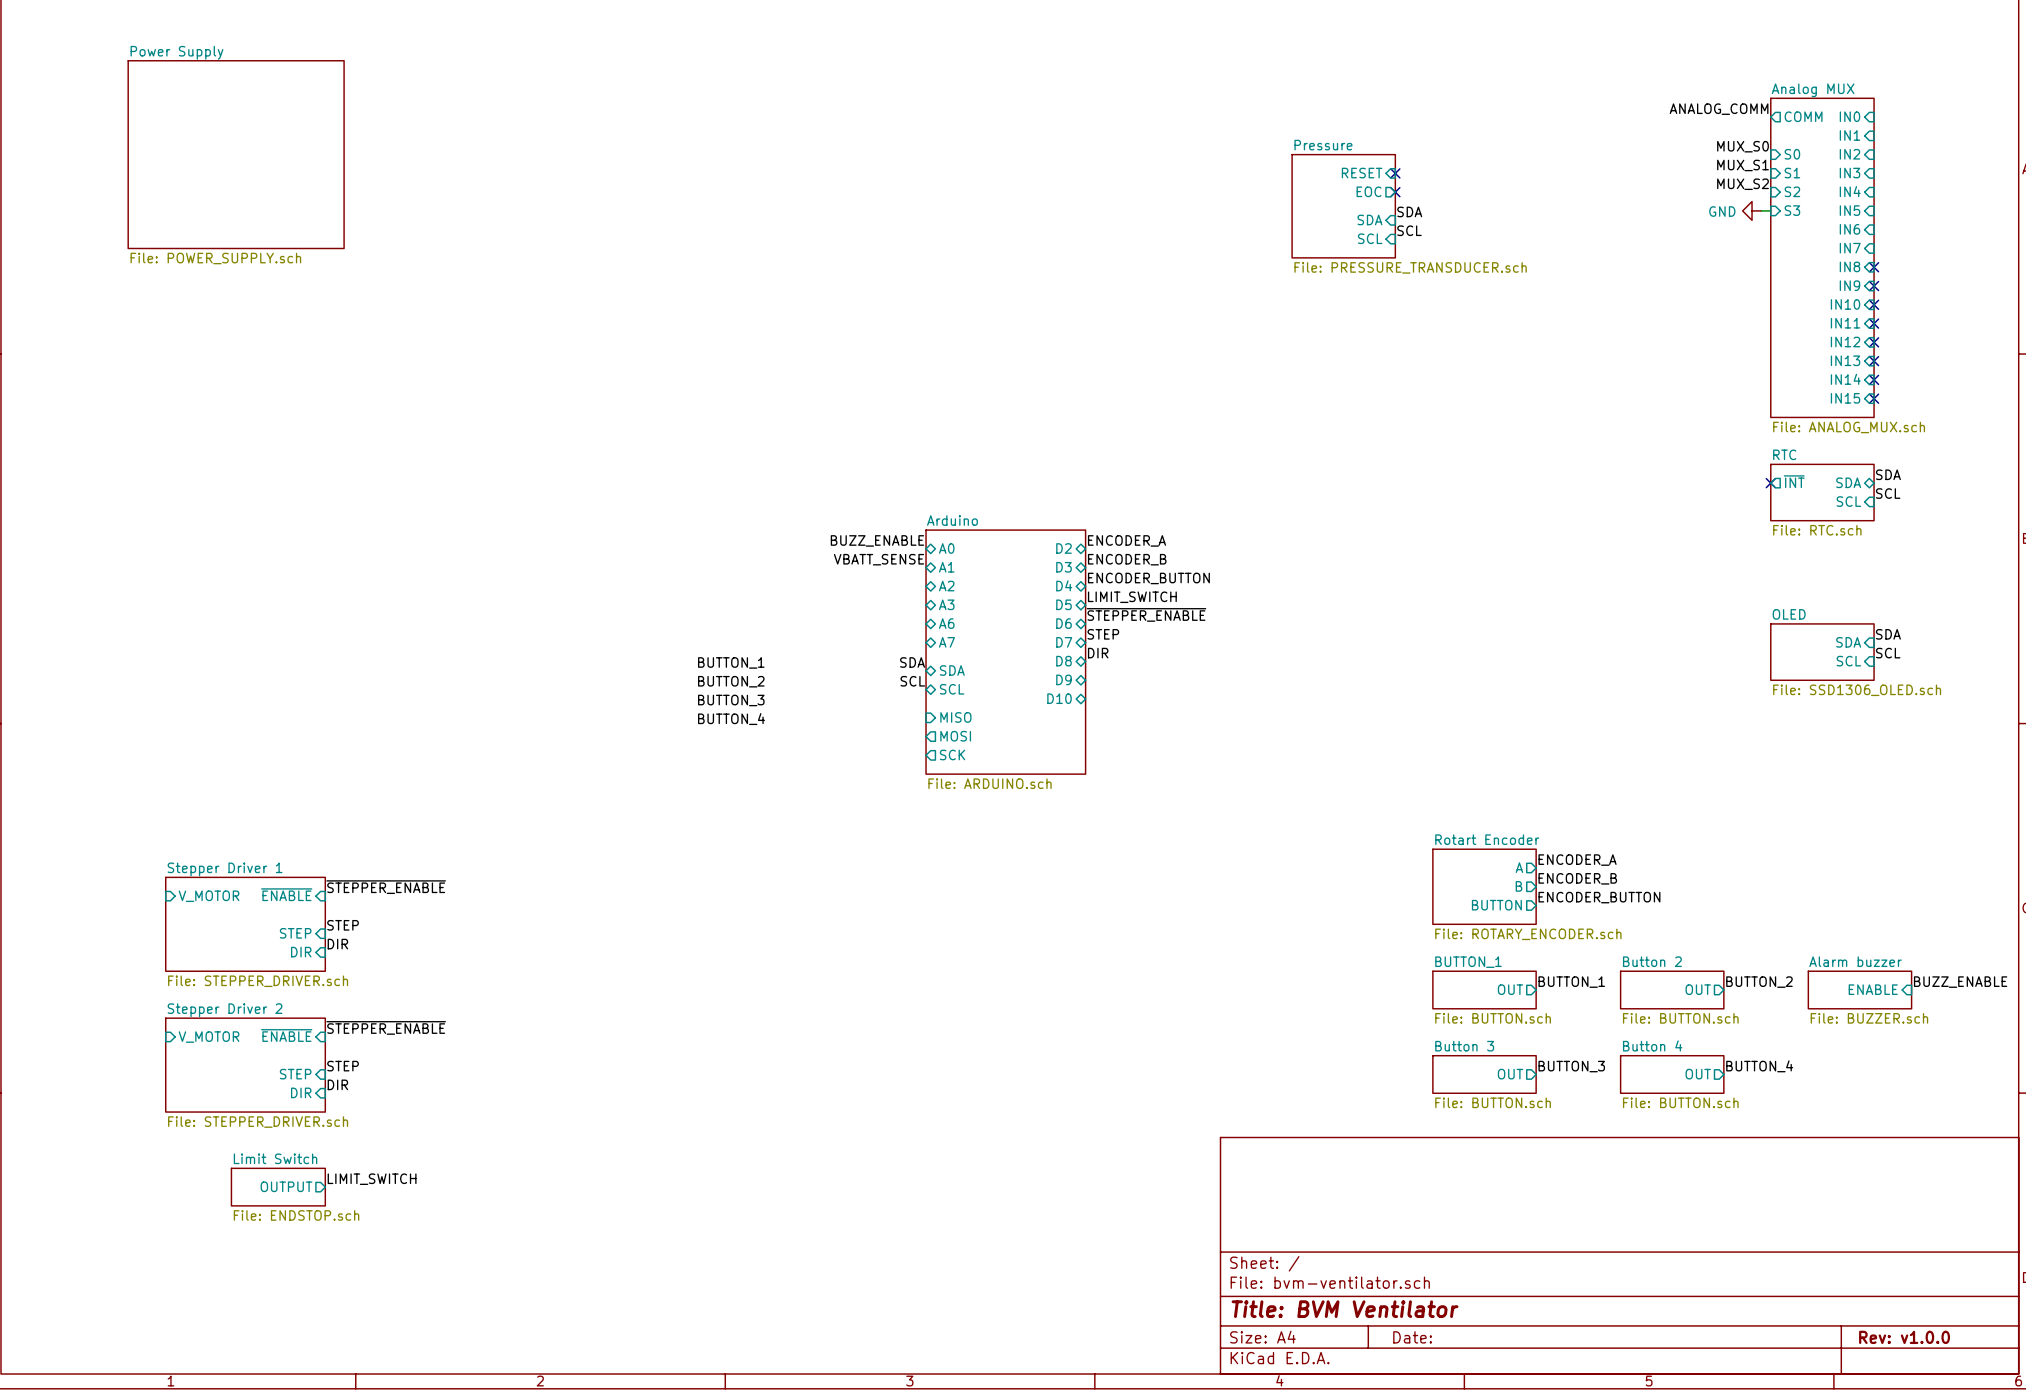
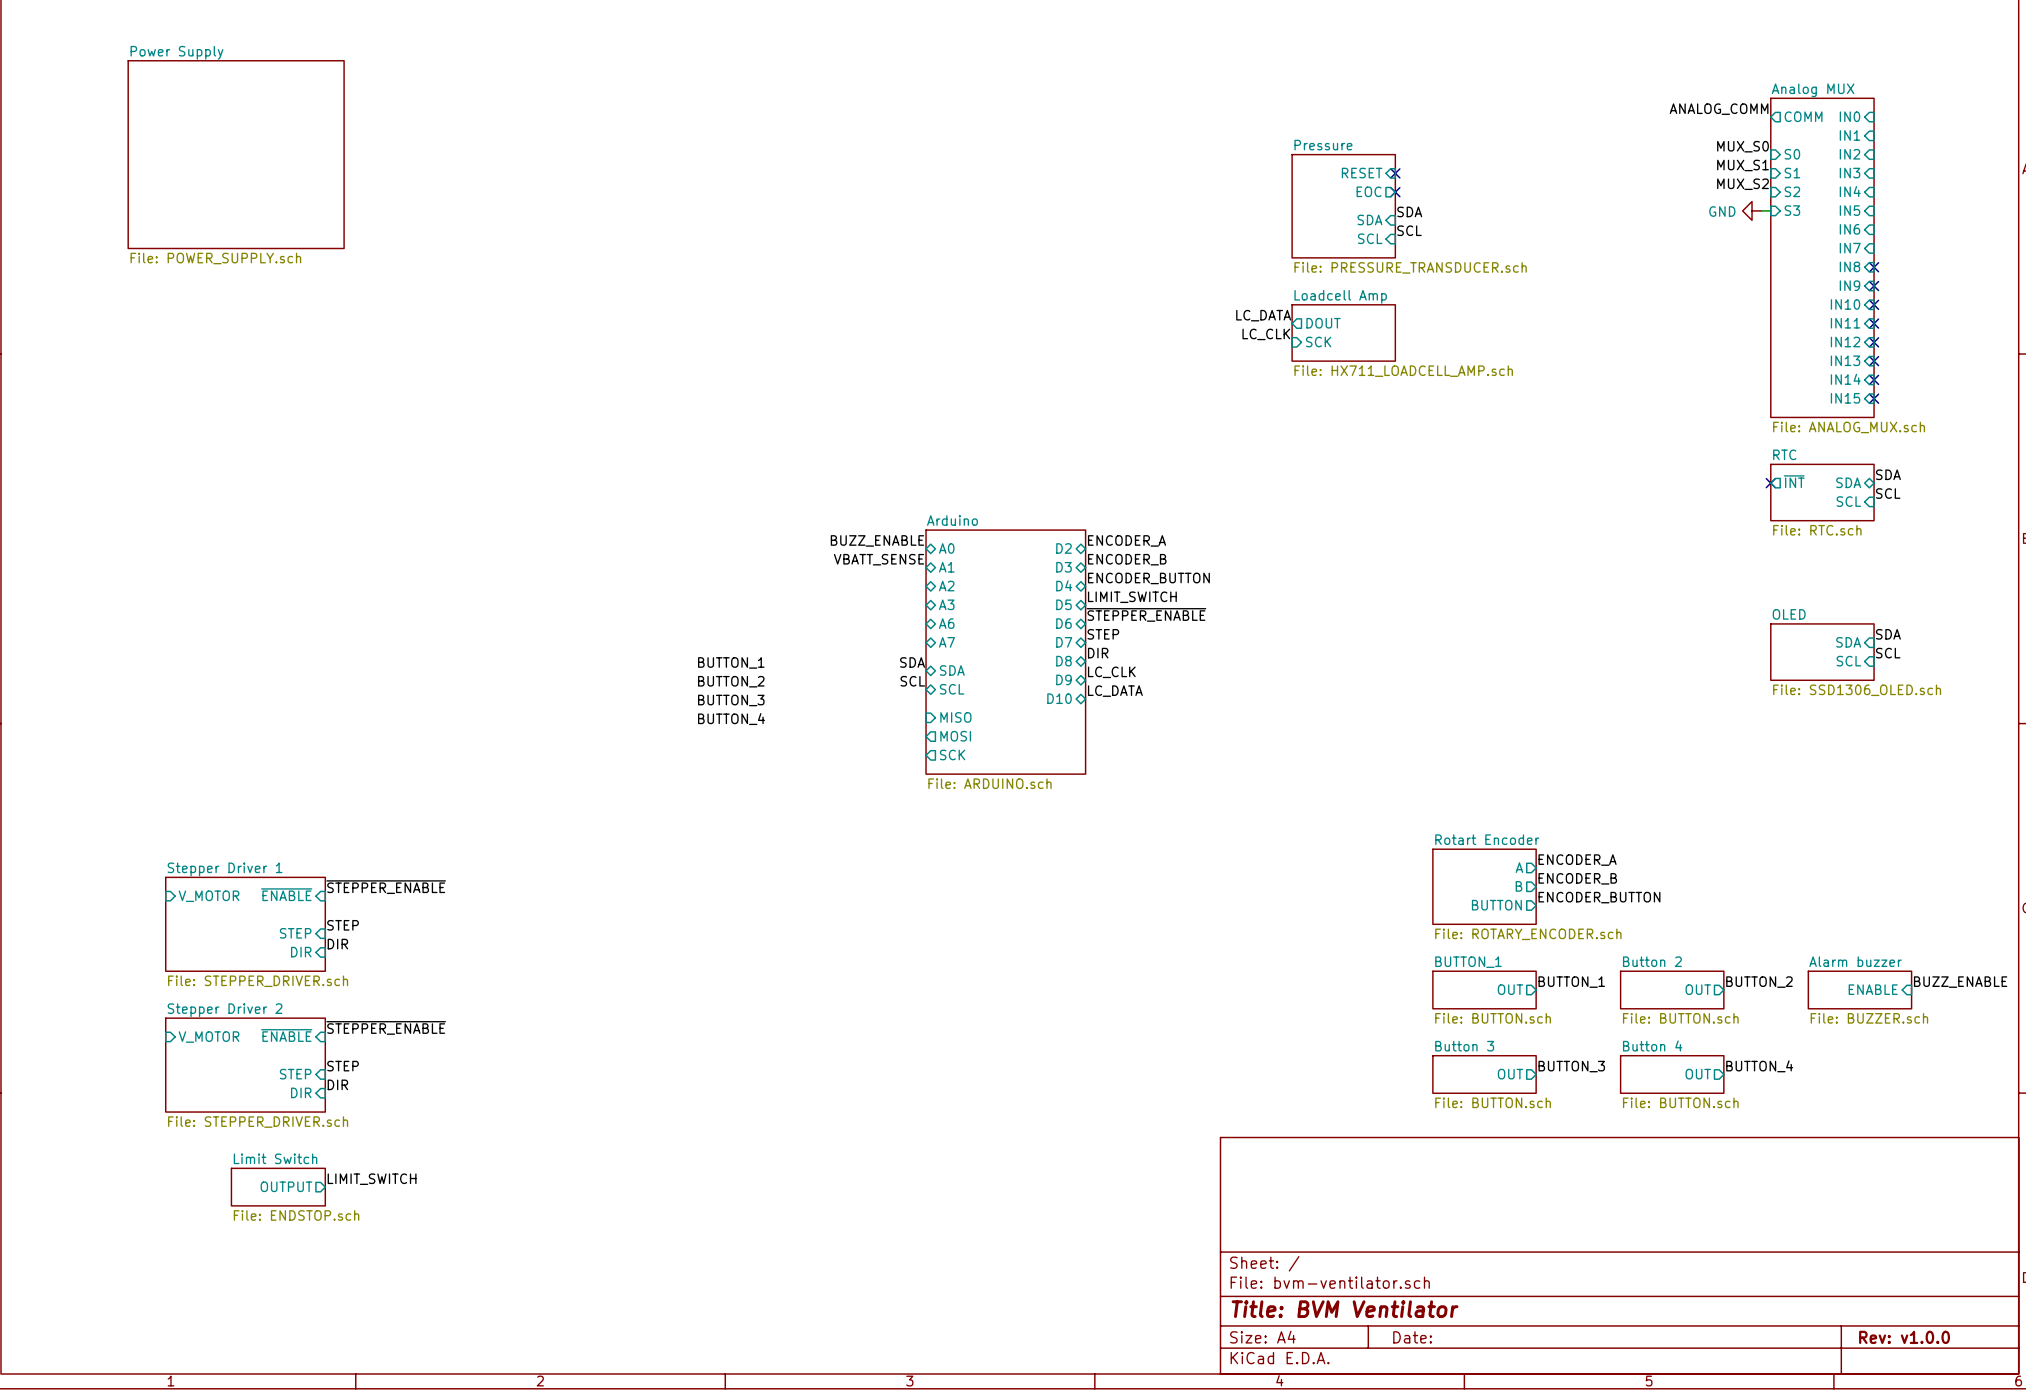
label: none -> LC_DATA (1263, 315)
sheet pin: none -> DOUT (1323, 323)
sheet Loadcell Amp: none -> File: HX711_LOADCELL_AMP.sch (1343, 332)
label: none -> LC_CLK (1266, 334)
sheet pin: none -> SCK (1318, 342)
label: none -> LC_CLK (1111, 672)
label: none -> LC_DATA (1115, 691)

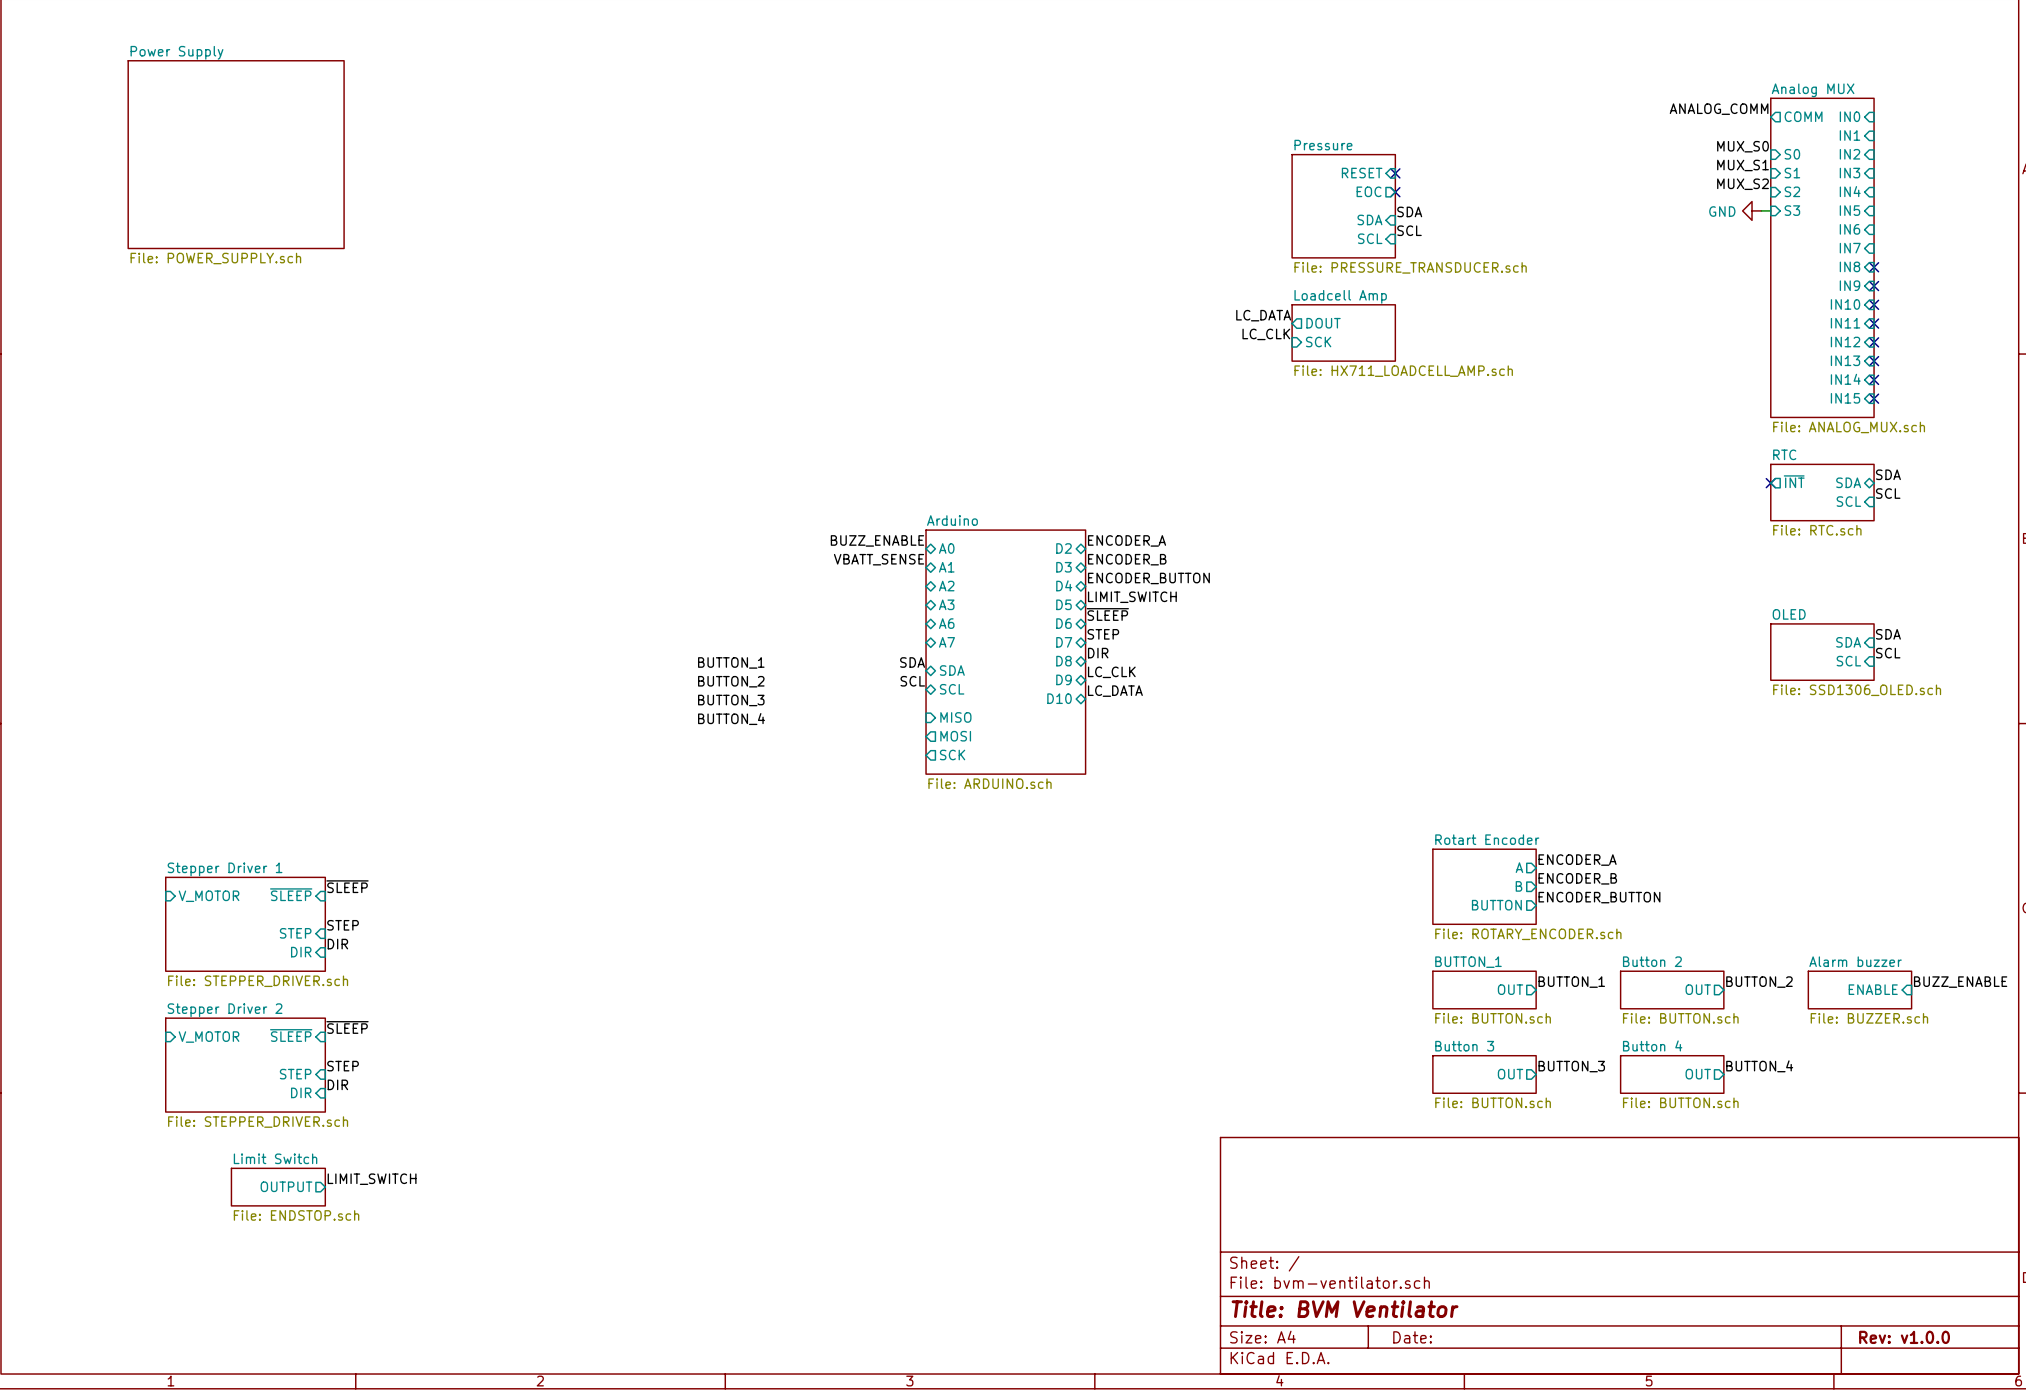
label: ~{STEPPER_ENABLE} (1146, 614) -> ~{SLEEP} (1107, 614)
label: ~{STEPPER_ENABLE} (386, 887) -> ~{SLEEP} (347, 886)
sheet pin: ~{ENABLE} (286, 894) -> ~{SLEEP} (291, 894)
label: ~{STEPPER_ENABLE} (386, 1027) -> ~{SLEEP} (347, 1027)
sheet pin: ~{ENABLE} (286, 1035) -> ~{SLEEP} (291, 1035)

